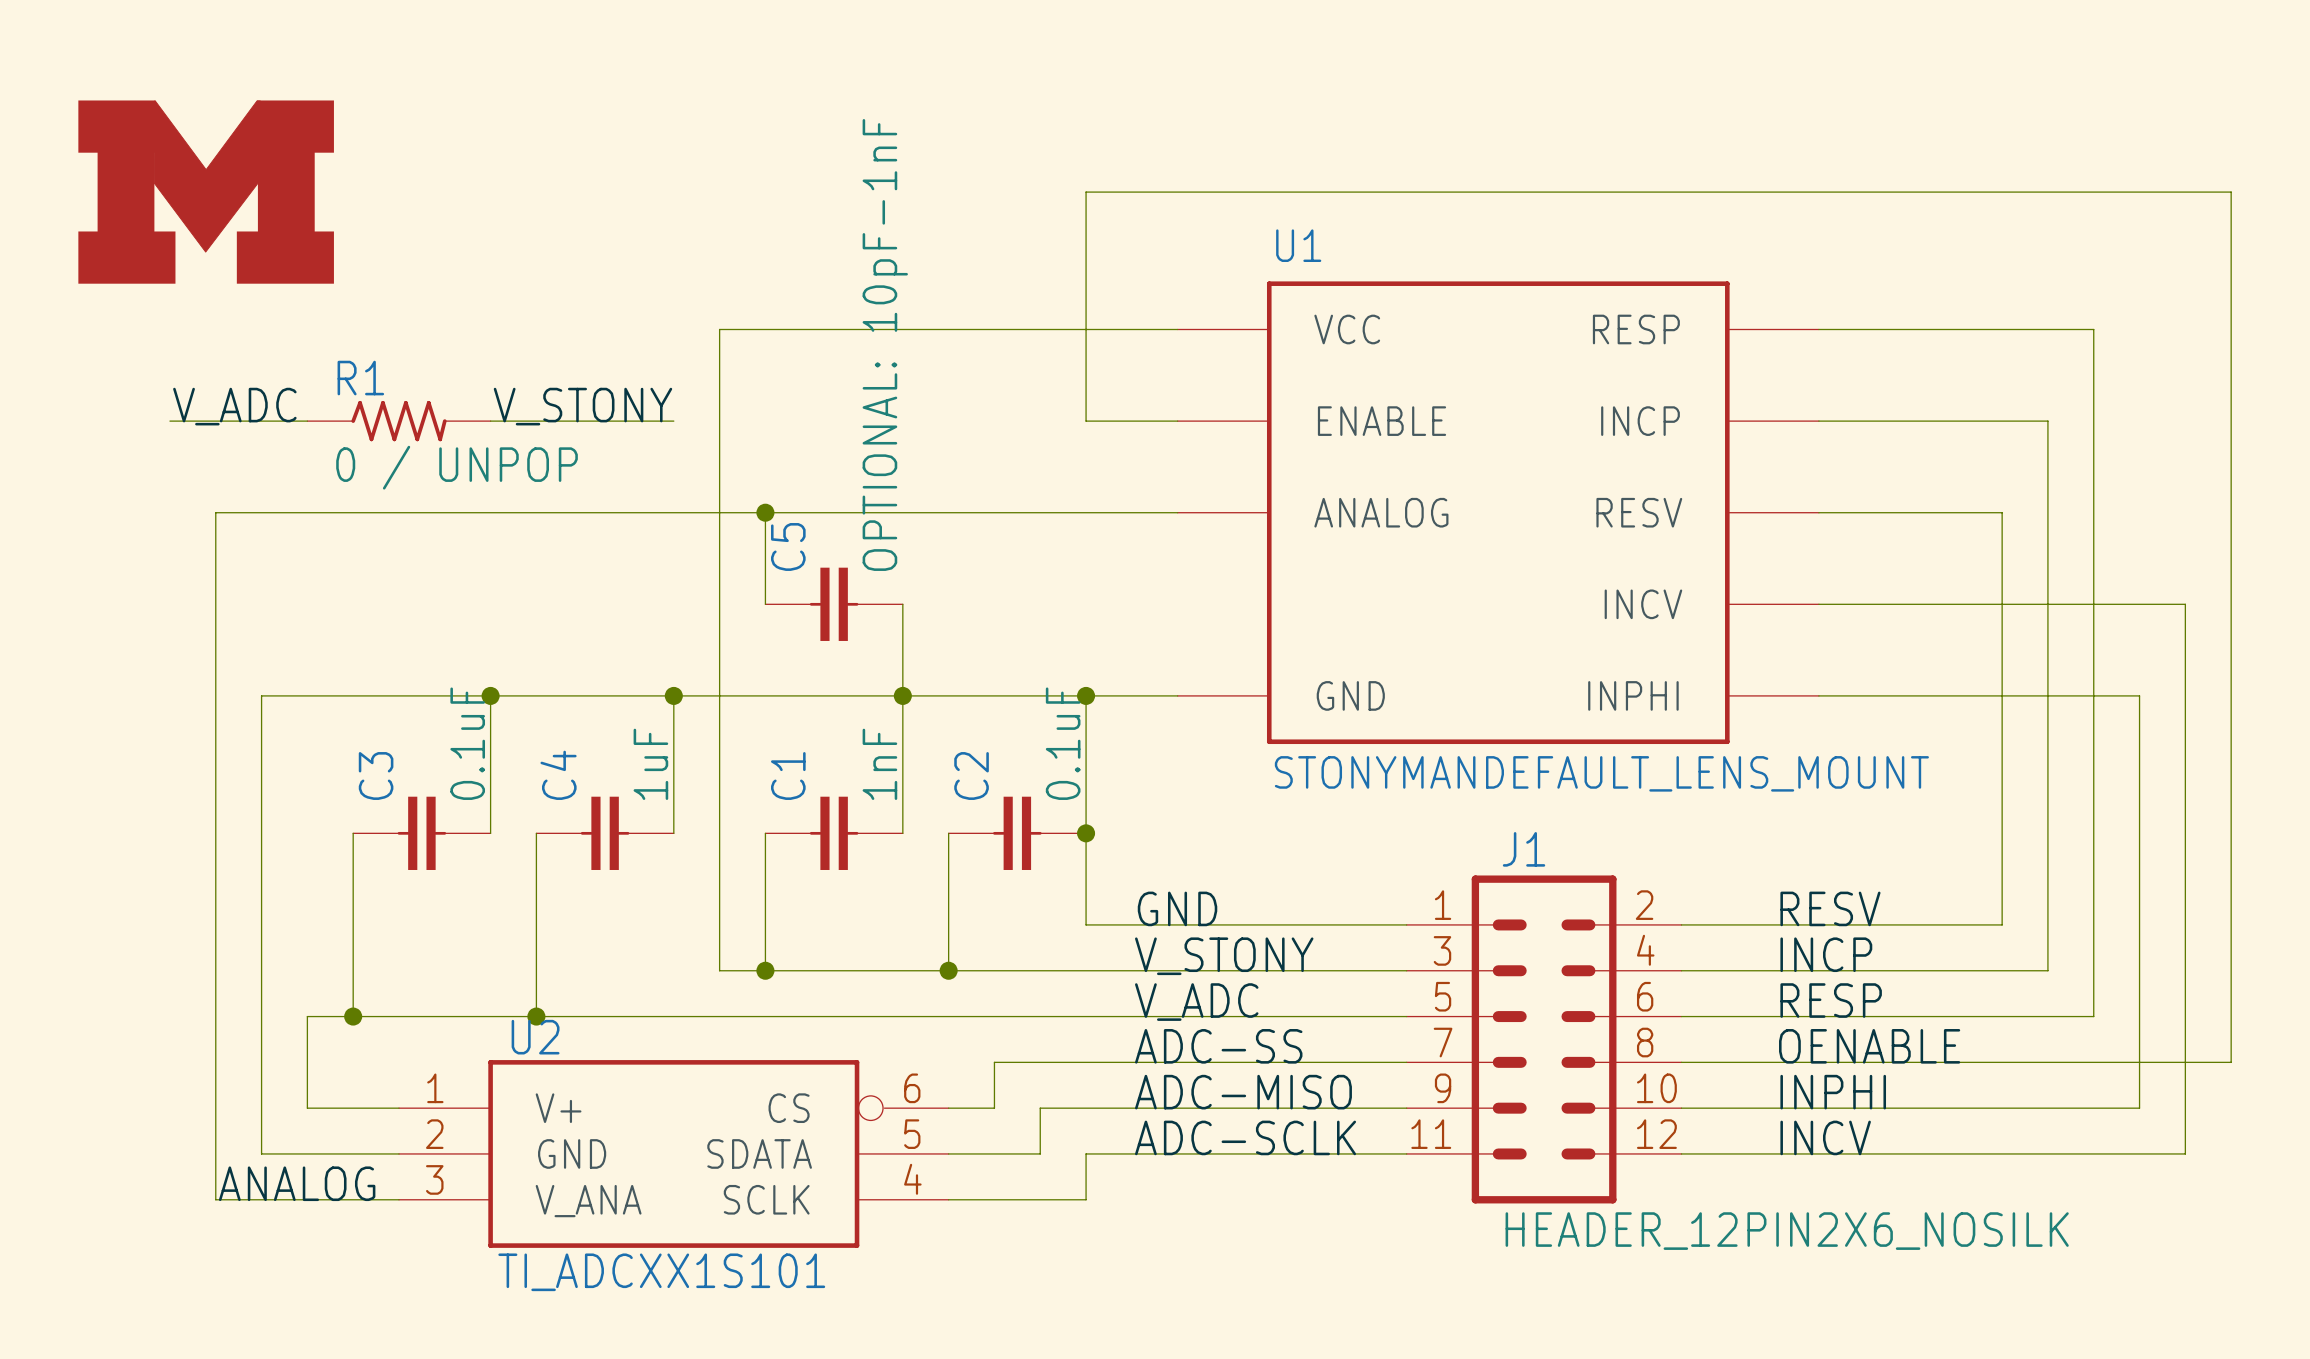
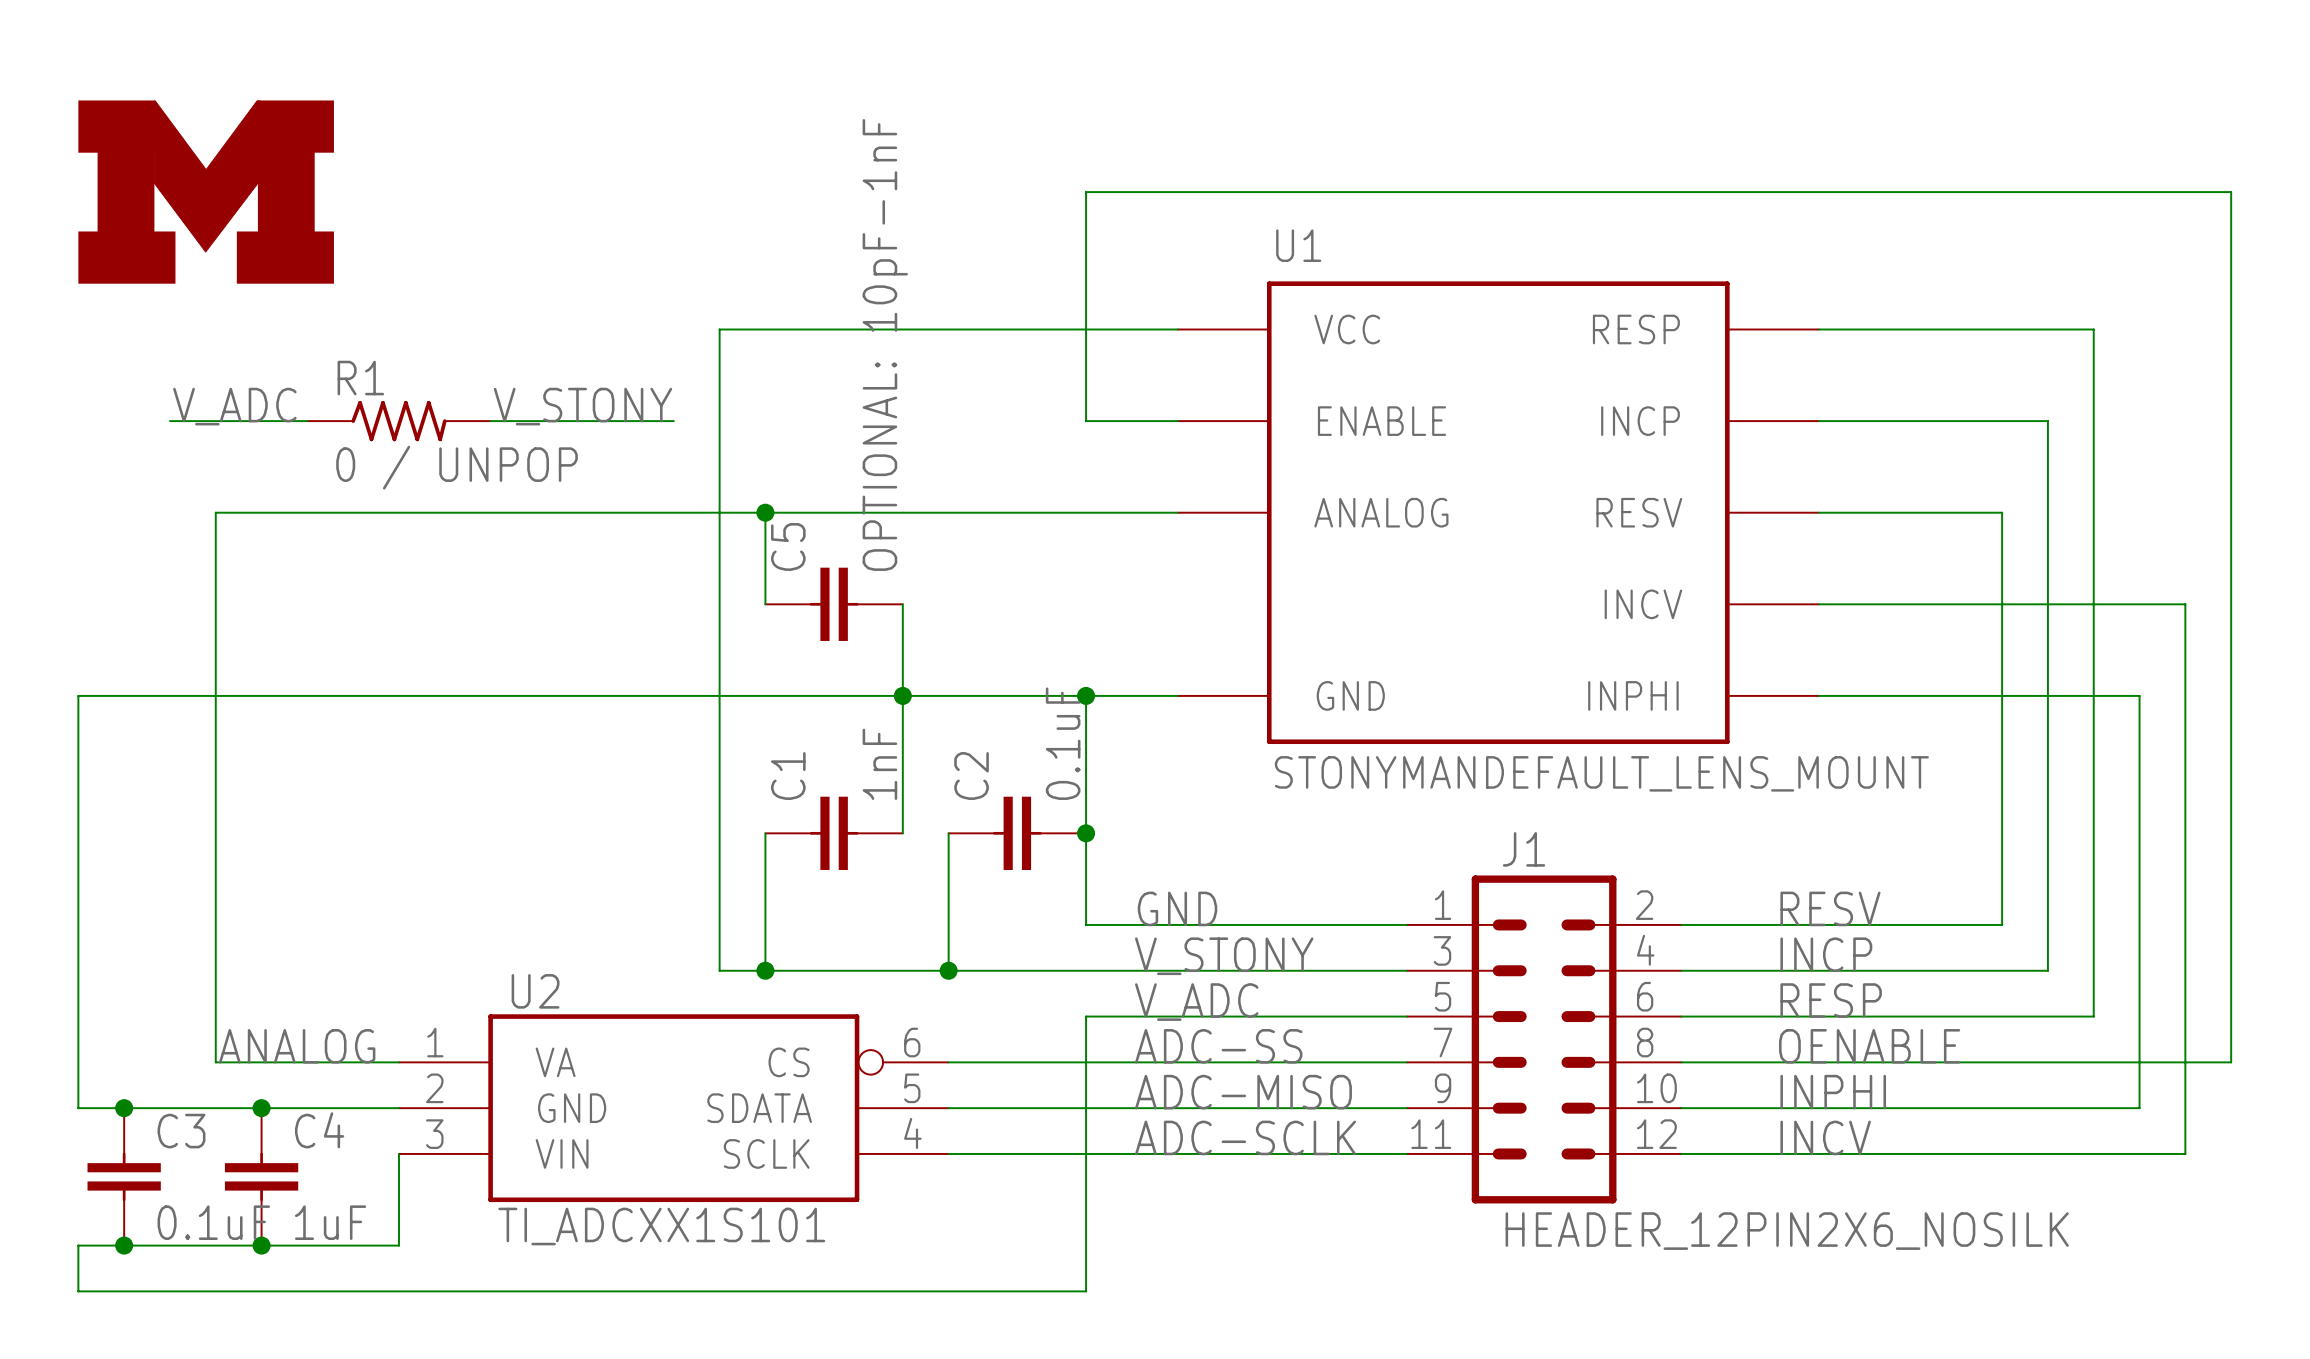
wire: (261, 695) (261, 1153) (398, 1153) -> (261, 695) (78, 695) (78, 1108) (307, 1108)
wire: (490, 695) (490, 833) -> none
junction: (490, 695) -> none
wire: (673, 695) (673, 833) -> none
junction: (673, 695) -> none
wire: (353, 833) (353, 1016) -> none
C3 rotation: 0° (421, 833) -> 90° clockwise (124, 1176)
C3 position: (421, 833) -> (124, 1176)
wire: (536, 833) (536, 1016) -> none
C4 rotation: 0° (605, 833) -> 90° clockwise (261, 1176)
C4 position: (605, 833) -> (261, 1176)
junction: (353, 1016) -> none
junction: (536, 1016) -> none
wire: (1086, 1016) (307, 1016) (307, 1108) -> none
wire: (215, 1062) (215, 1199) (398, 1199) -> (215, 1062) (398, 1062)
wire: none -> (948, 1062) (994, 1062)
wire: (994, 1062) (994, 1108) -> (1040, 1108) (994, 1108)
junction: none -> (124, 1108)
junction: none -> (261, 1108)
U2 pin name: V+ (558, 1108) -> VA (555, 1062)
wire: (1040, 1108) (1040, 1153) -> (1086, 1016) (1086, 1153) (1040, 1153)
U2 position: (673, 1153) -> (673, 1108)
label position: ANALOG (297, 1183) -> ANALOG (297, 1046)
wire: (948, 1199) (1086, 1199) -> (398, 1153) (398, 1245) (78, 1245) (78, 1291) (1086, 1291) (1086, 1199)
U2 pin name: V_ANA (588, 1201) -> VIN (562, 1153)
junction: none -> (124, 1245)
junction: none -> (261, 1245)

